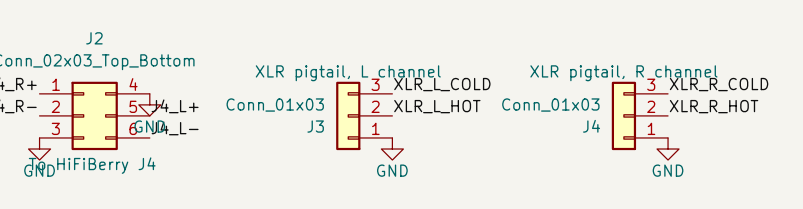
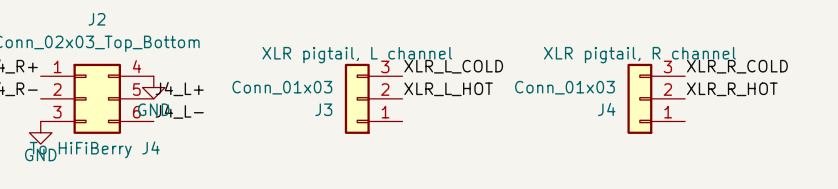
power symbol: GND (392, 149) -> none
power symbol: GND (668, 149) -> none

